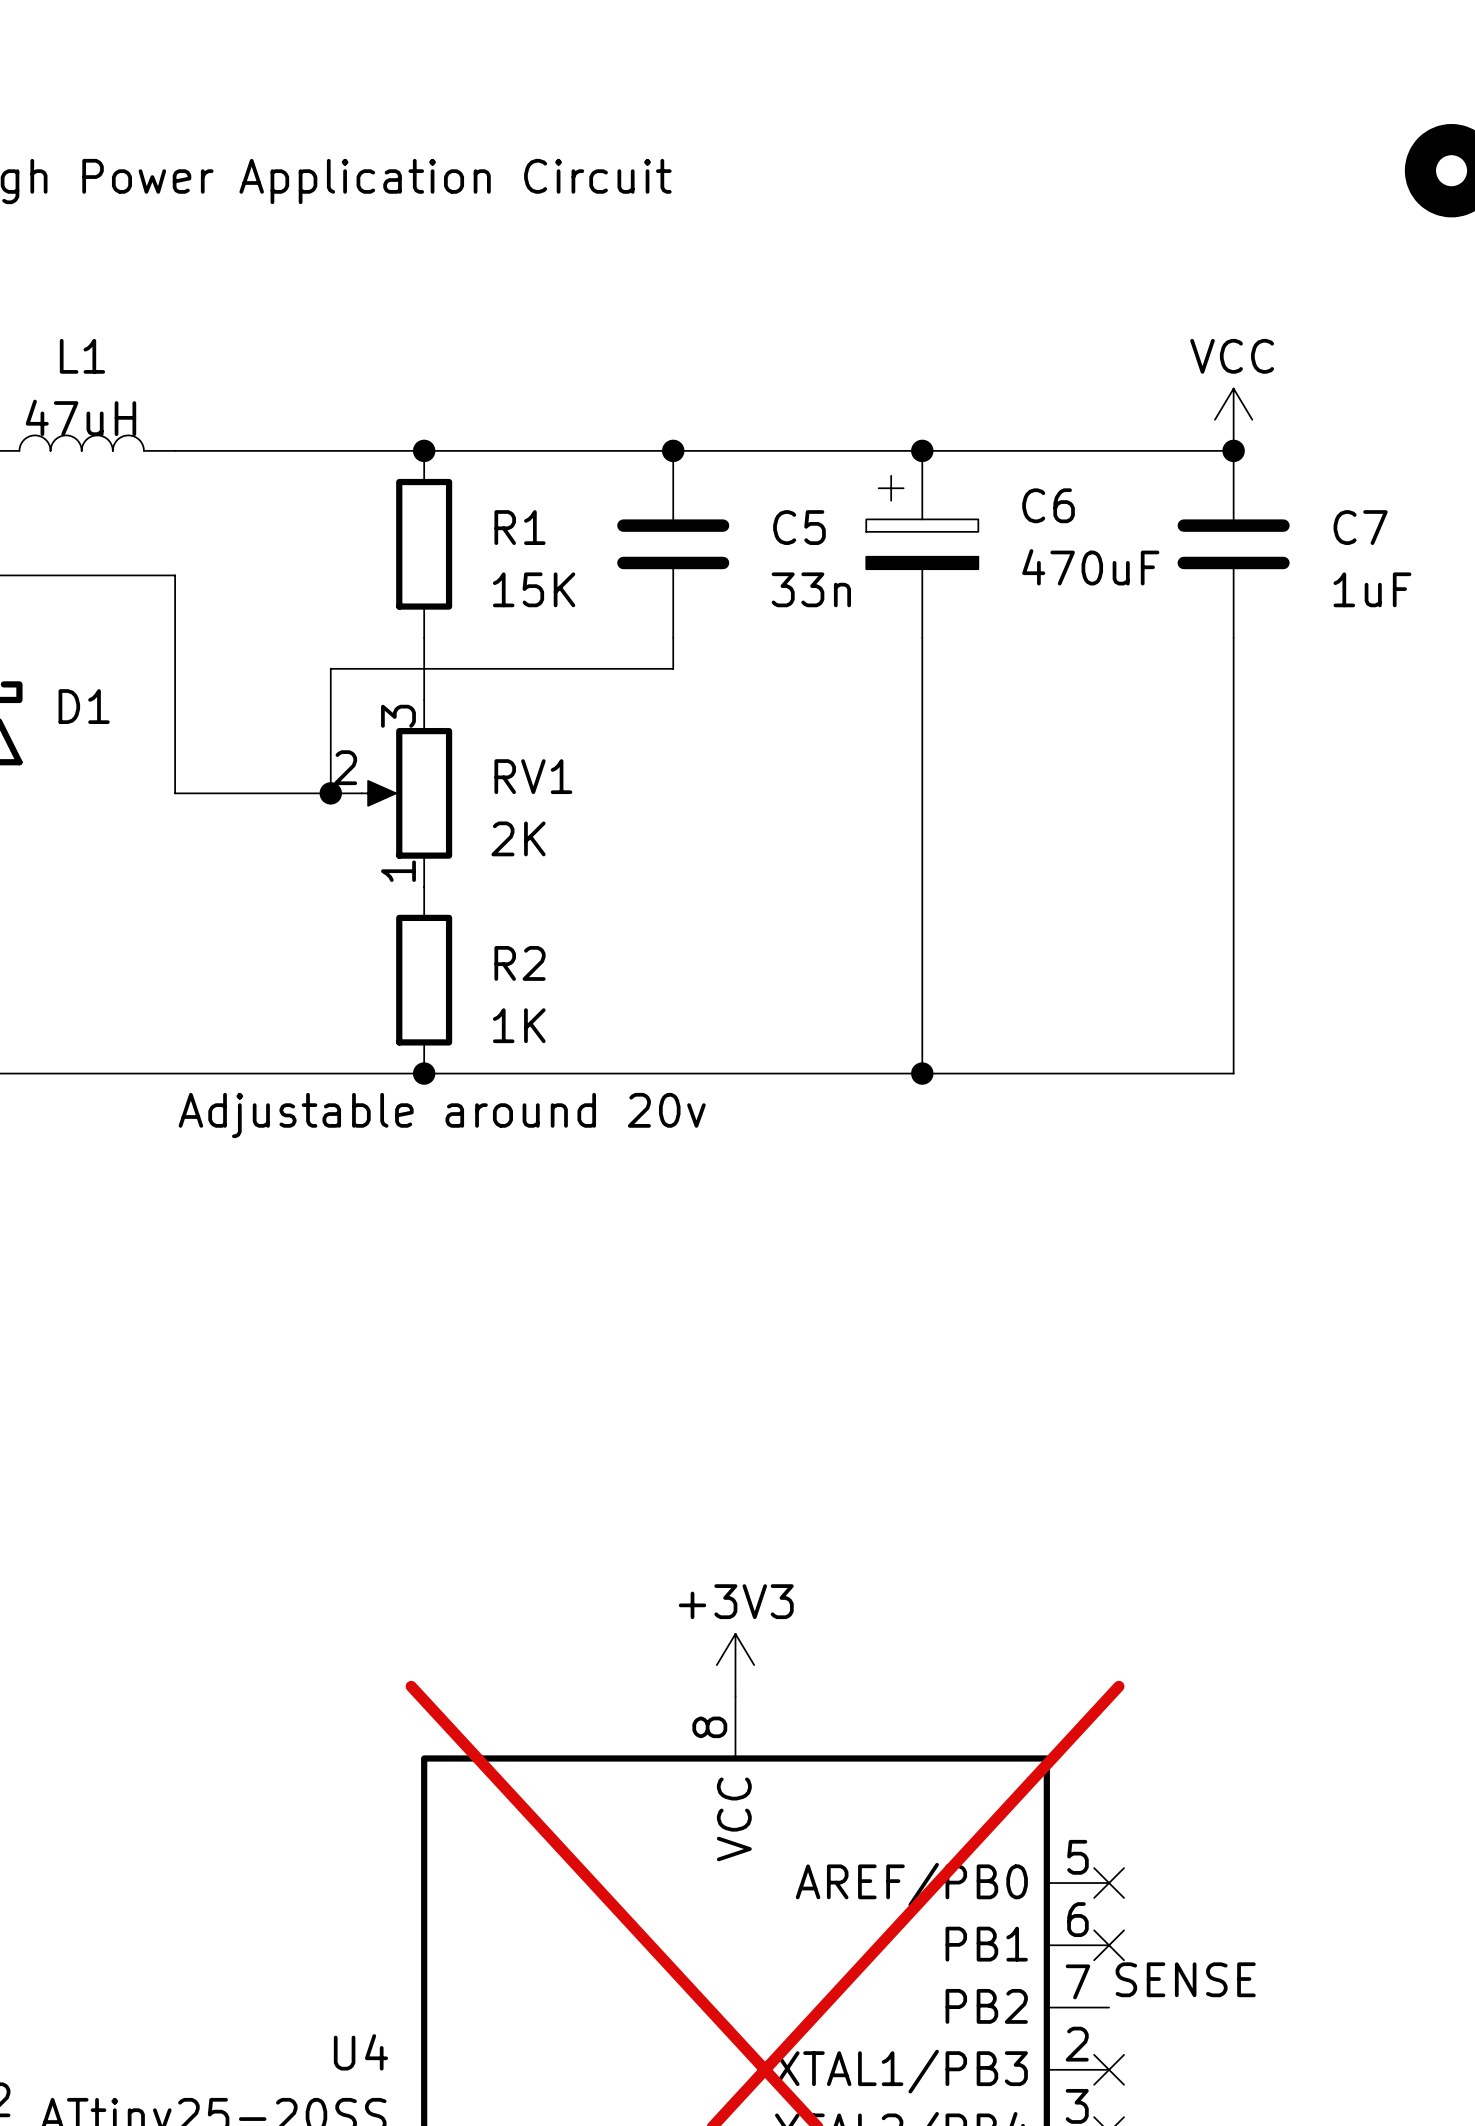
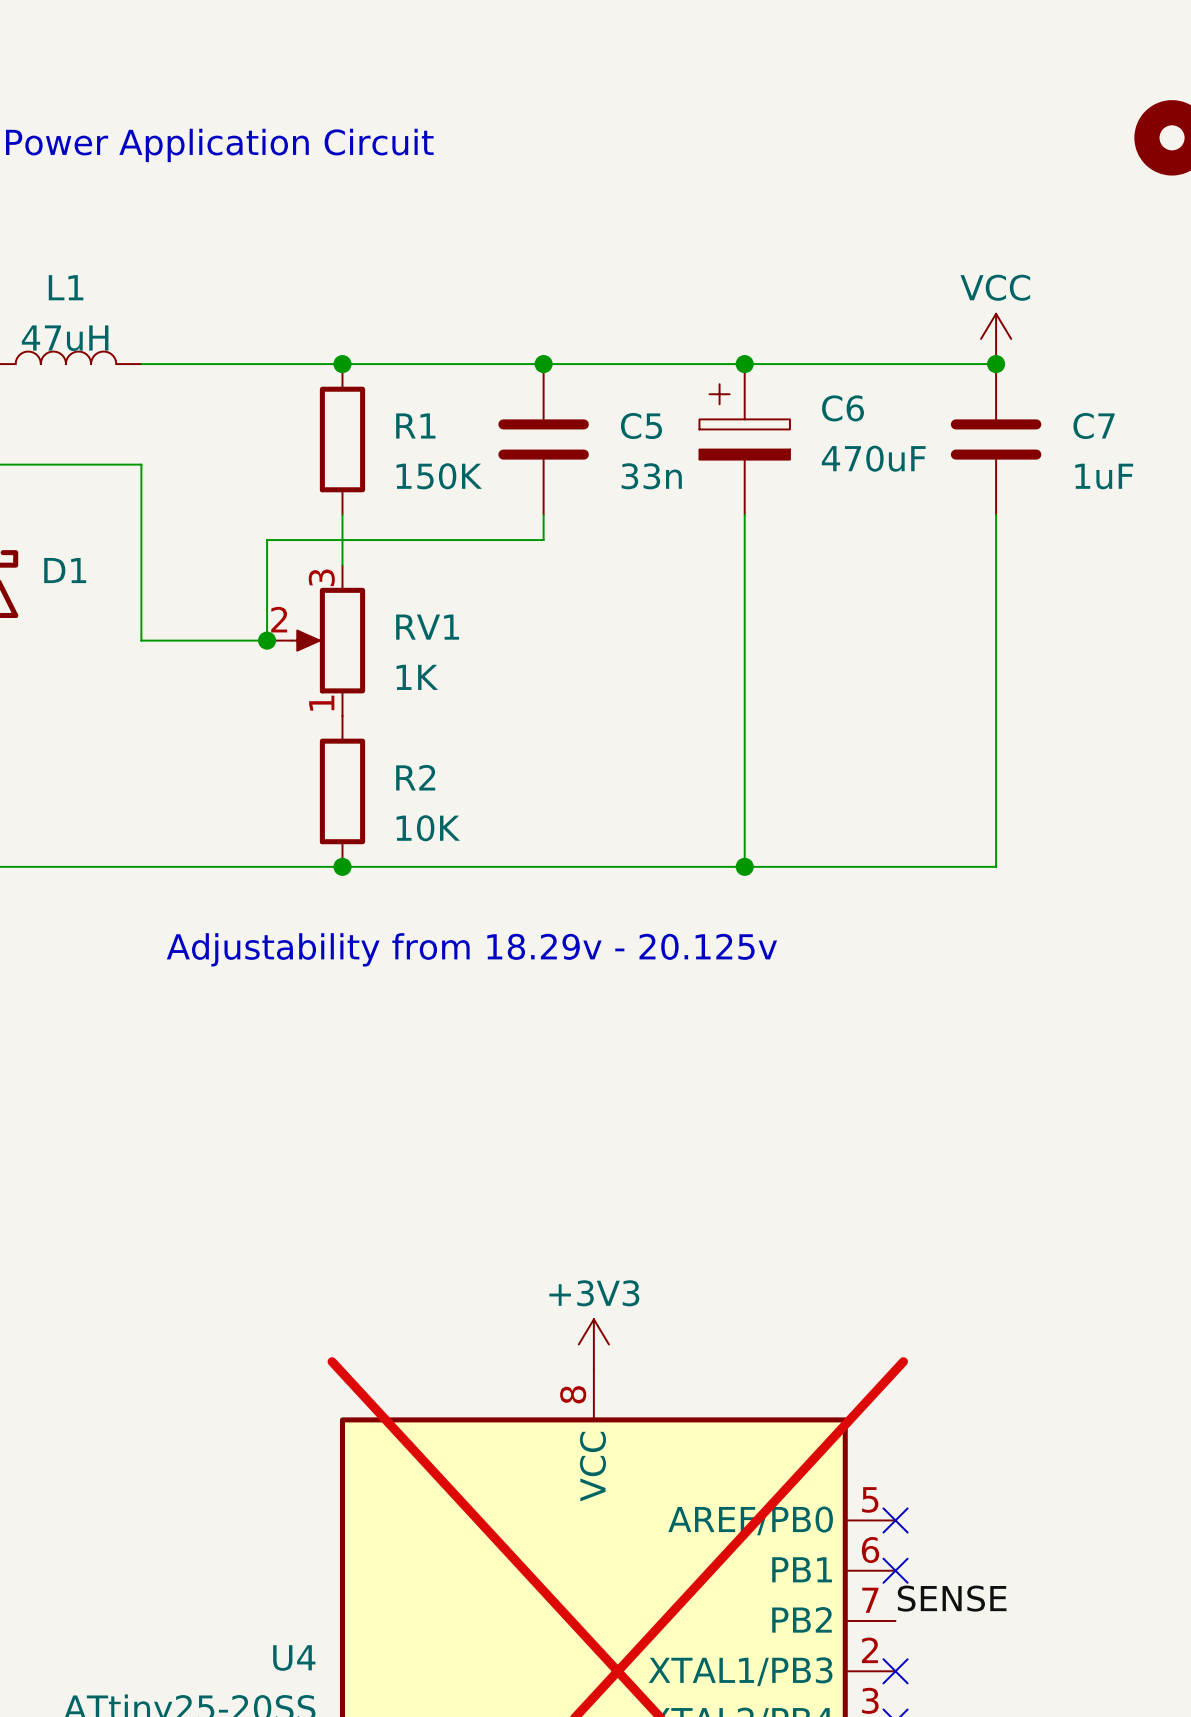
R1 value: 15K (534, 589) -> 150K (439, 476)
RV1 value: 2K (518, 838) -> 1K (417, 677)
R2 value: 1K (519, 1025) -> 10K (428, 828)
text: Adjustable around 20v (442, 1115) -> none
text: none -> Adjustability from 18.29v - 20.125v (471, 949)

